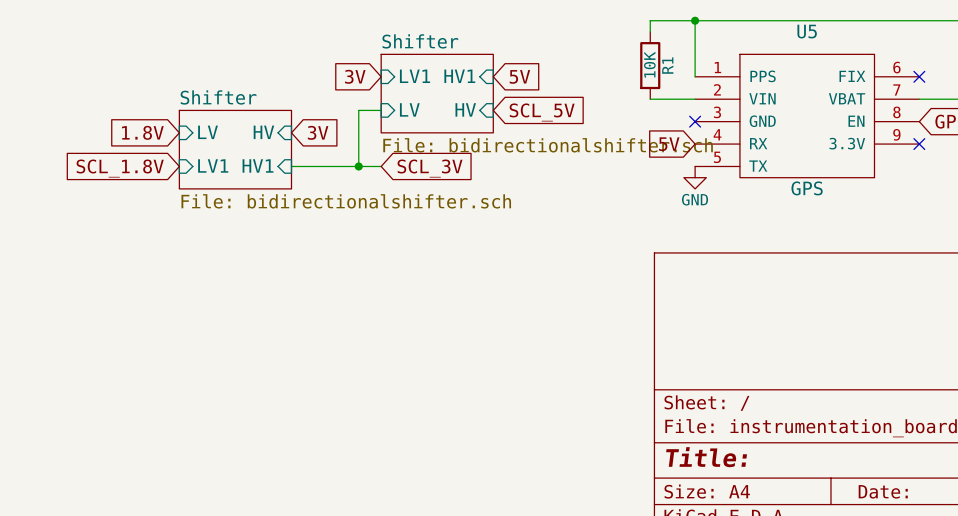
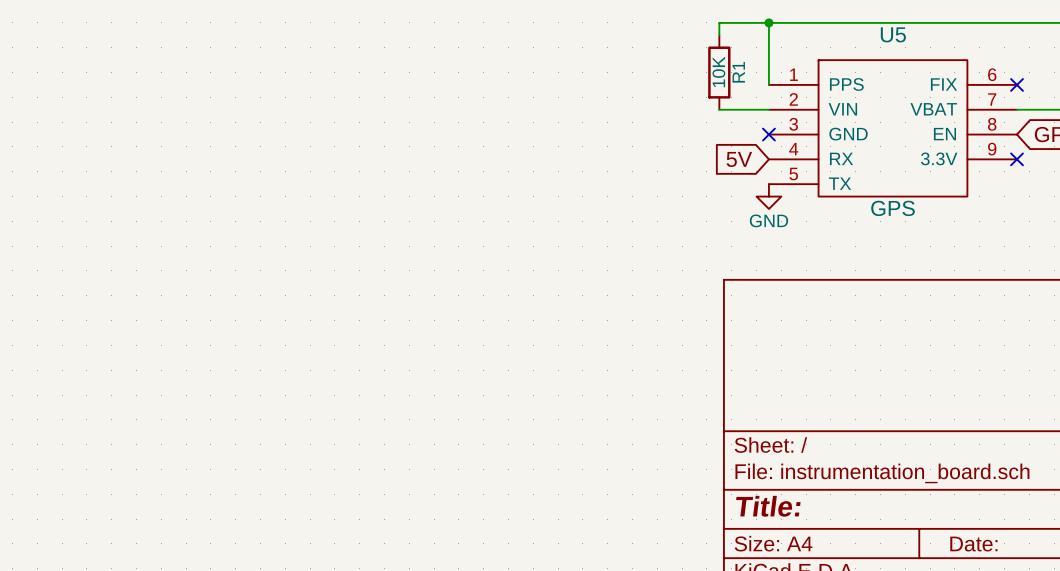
global label: 3V (355, 76) -> none
sheet pin: LV1 (415, 76) -> none
sheet pin: HV1 (459, 76) -> none
global label: 5V (519, 76) -> none
sheet Shifter: File: bidirectionalshifter.sch (437, 93) -> none
sheet pin: LV (409, 109) -> none
sheet pin: HV (465, 109) -> none
wire: (381, 110) (358, 110) (358, 166) -> none
global label: SCL_5V (542, 112) -> none
global label: 1.8V (142, 132) -> none
sheet pin: LV (208, 132) -> none
sheet pin: HV (263, 132) -> none
global label: 3V (318, 132) -> none
sheet Shifter: File: bidirectionalshifter.sch (235, 149) -> none
sheet pin: LV1 (213, 165) -> none
sheet pin: HV1 (258, 165) -> none
wire: (291, 166) (381, 166) -> none
junction: (358, 166) -> none
global label: SCL_1.8V (120, 168) -> none
global label: SCL_3V (430, 168) -> none

